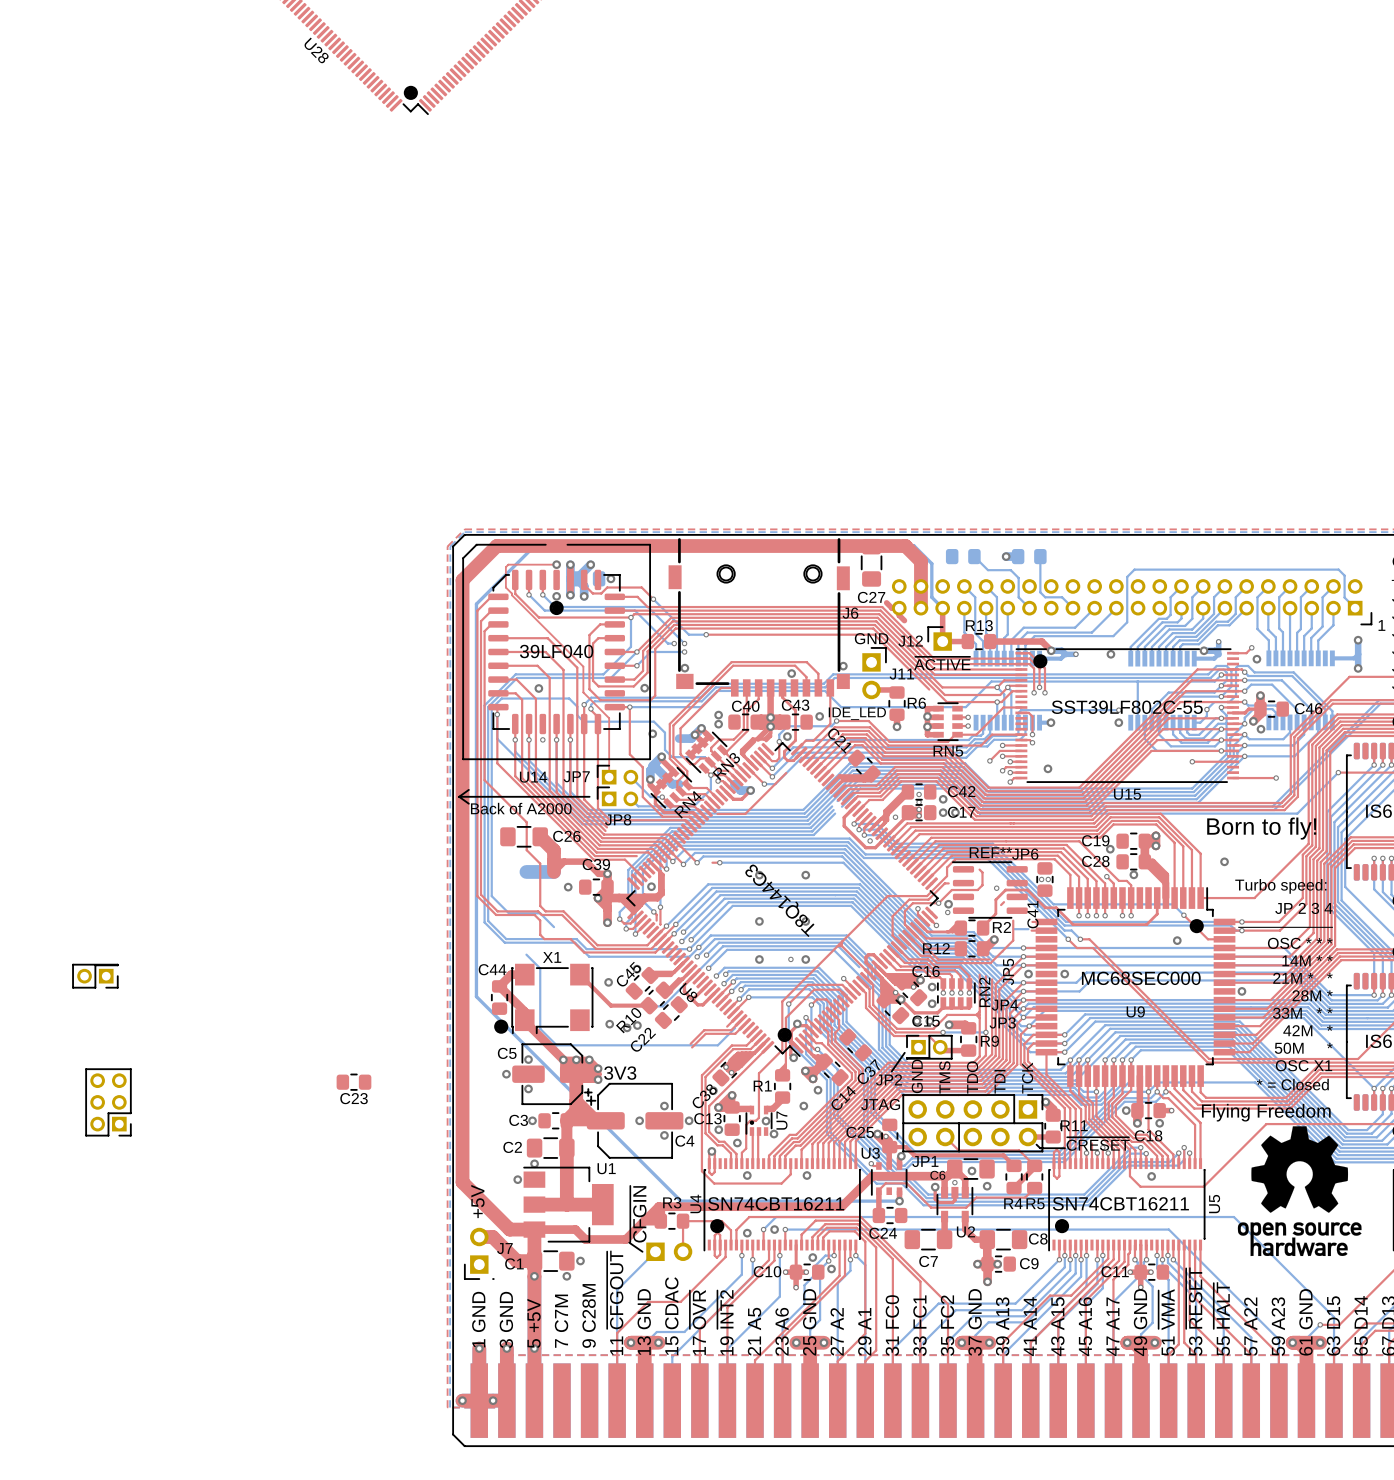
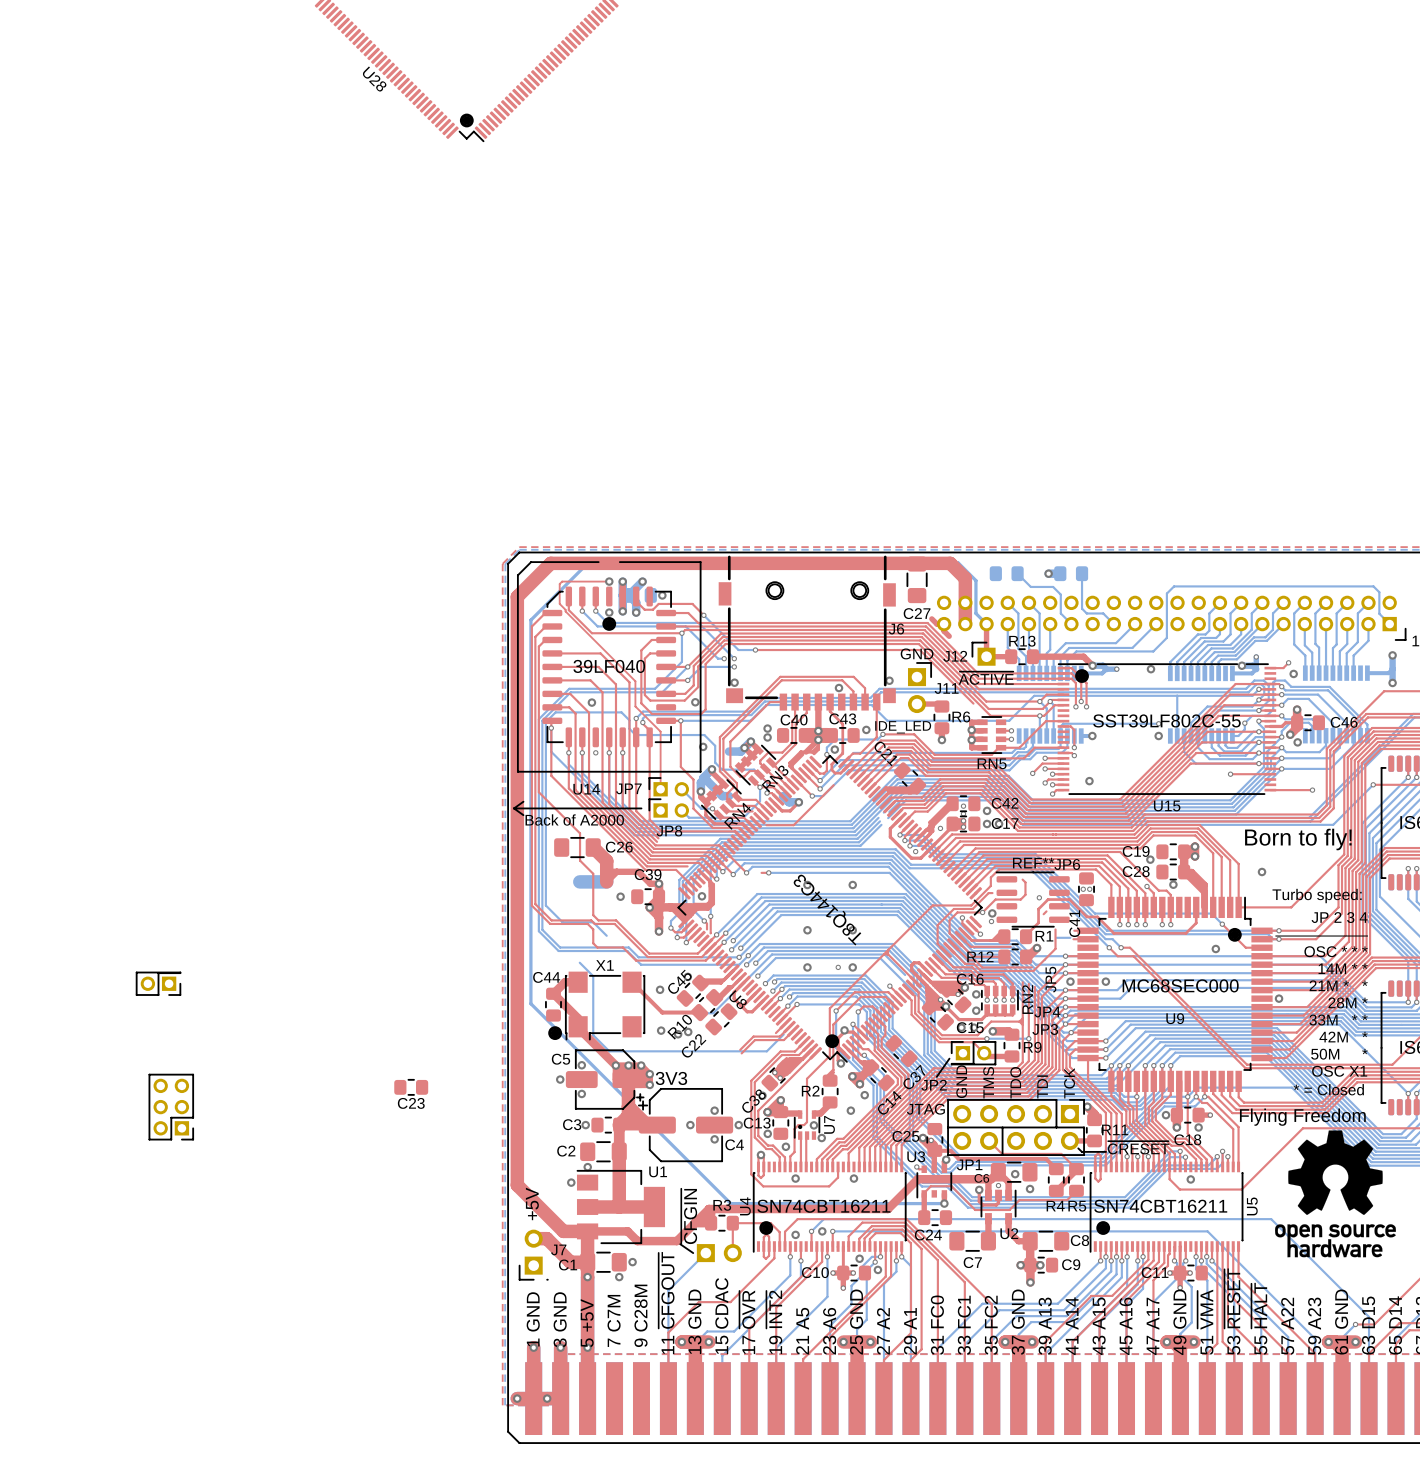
R2 name: R2 (1001, 927) -> R1 (1044, 936)
R1 name: R1 (762, 1086) -> R2 (810, 1091)

